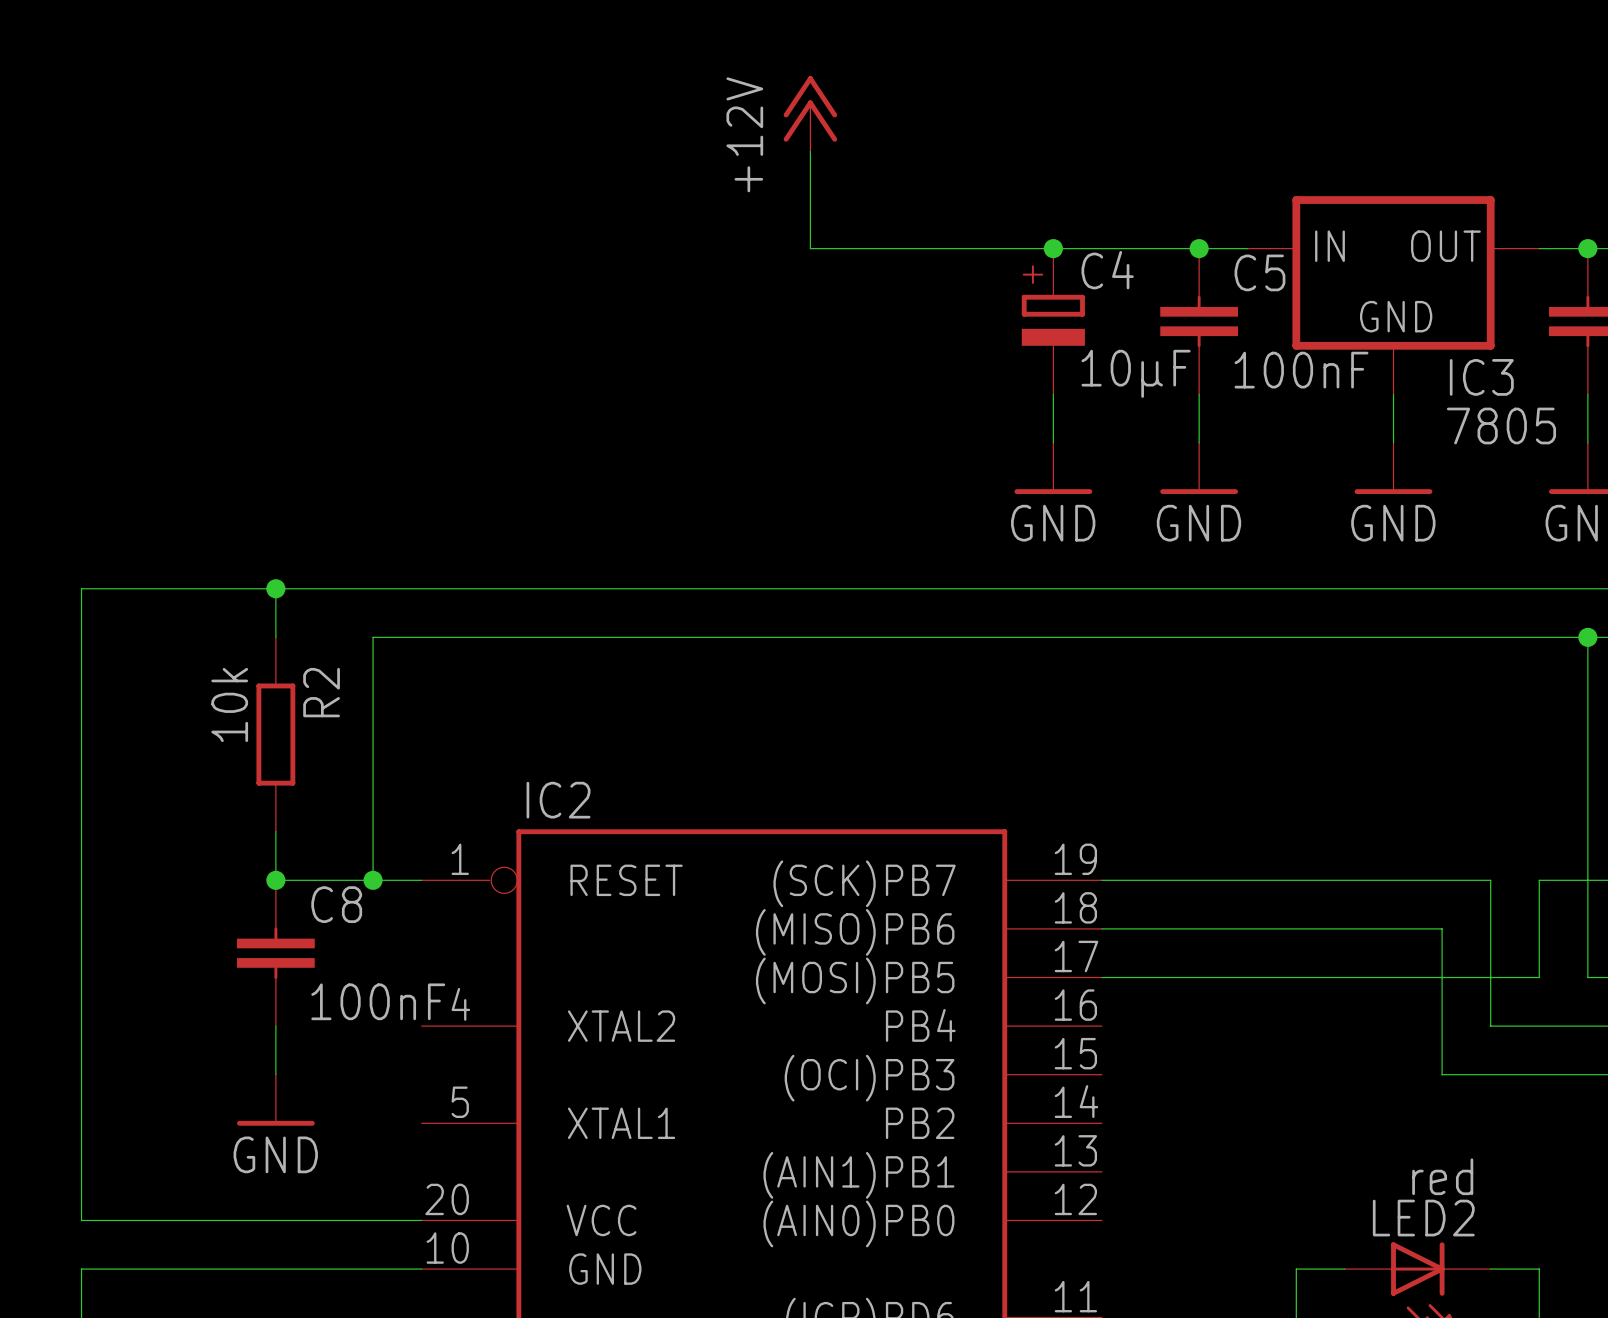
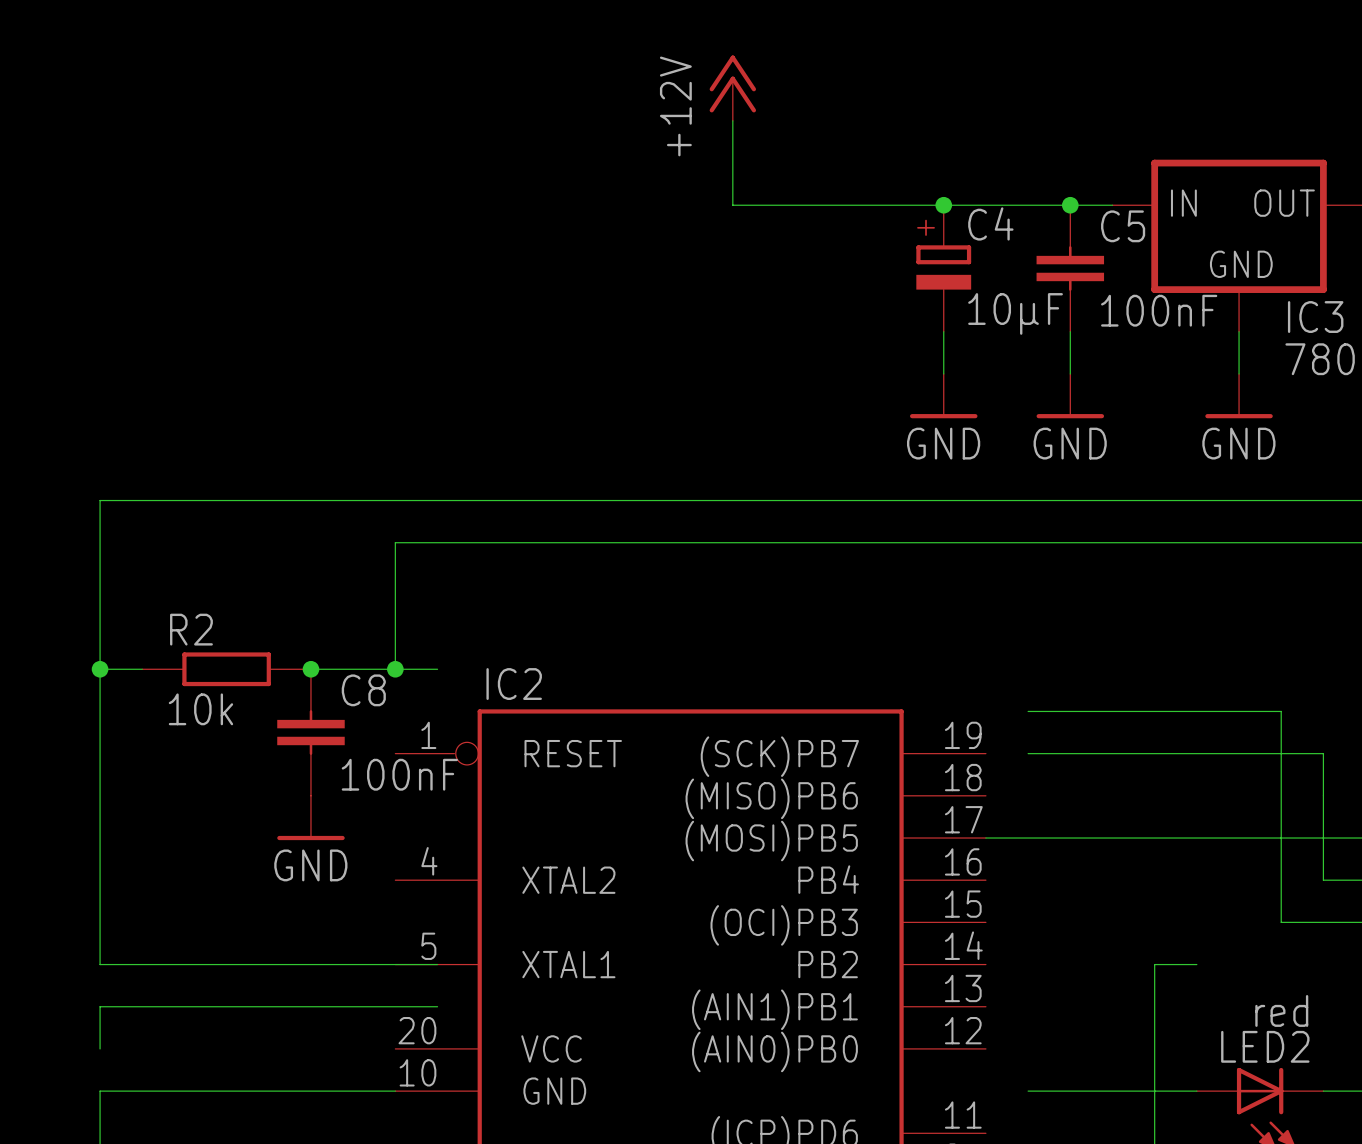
wire: (275, 588) (275, 637) -> none
junction: (275, 588) -> none
wire: (421, 637) (373, 637) (373, 880) -> (395, 542) (395, 669)
R2 name position: R2 (321, 692) -> R2 (191, 629)
R2 value position: 10k (229, 705) -> 10k (200, 709)
R2 rotation: 0° (275, 734) -> 90° clockwise (226, 669)
wire: none -> (100, 669) (142, 669)
junction: none -> (100, 669)
wire: none -> (310, 669) (437, 669)
junction: none -> (310, 669)
junction: none -> (395, 669)
wire: (275, 831) (275, 880) (421, 880) -> none
junction: (275, 880) -> none
junction: (373, 880) -> none
wire: (1101, 880) (1150, 880) -> none
wire: (1101, 928) (1442, 928) -> (1028, 711) (1281, 711) (1281, 795)
C8 position: (275, 953) -> (310, 732)
wire: (275, 1026) (275, 1074) -> none
power symbol position: GND (275, 1100) -> GND (310, 817)
wire: (81, 1123) (81, 1171) -> (100, 964) (437, 964)
wire: none -> (1196, 964) (1154, 964) (1154, 1091) (1028, 1091)
wire: none -> (100, 1006) (437, 1006)
wire: (81, 1220) (421, 1220) -> none

